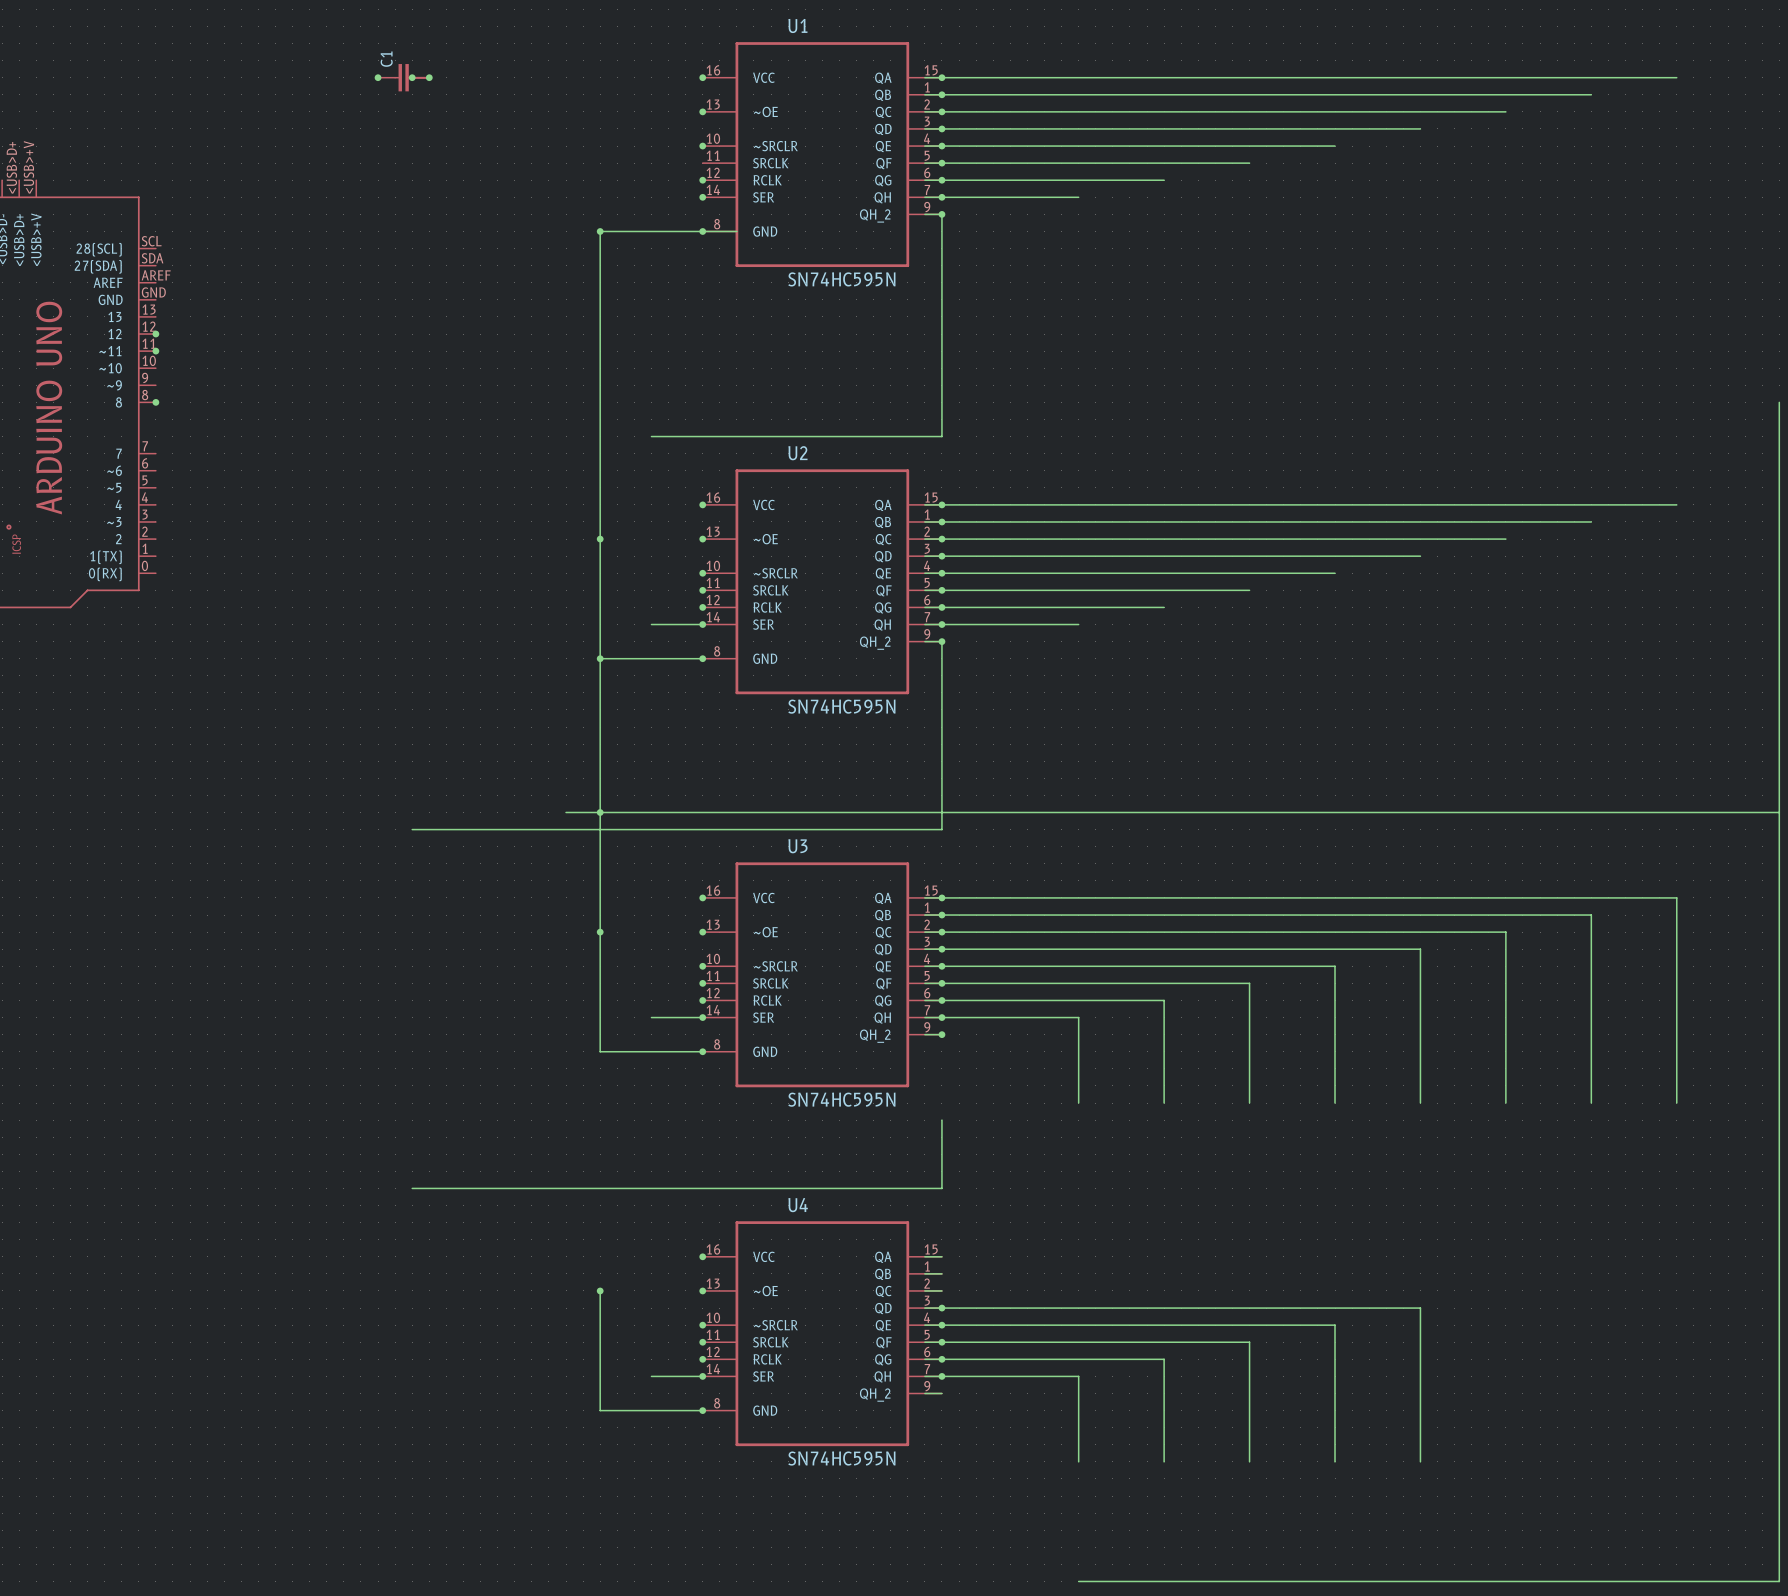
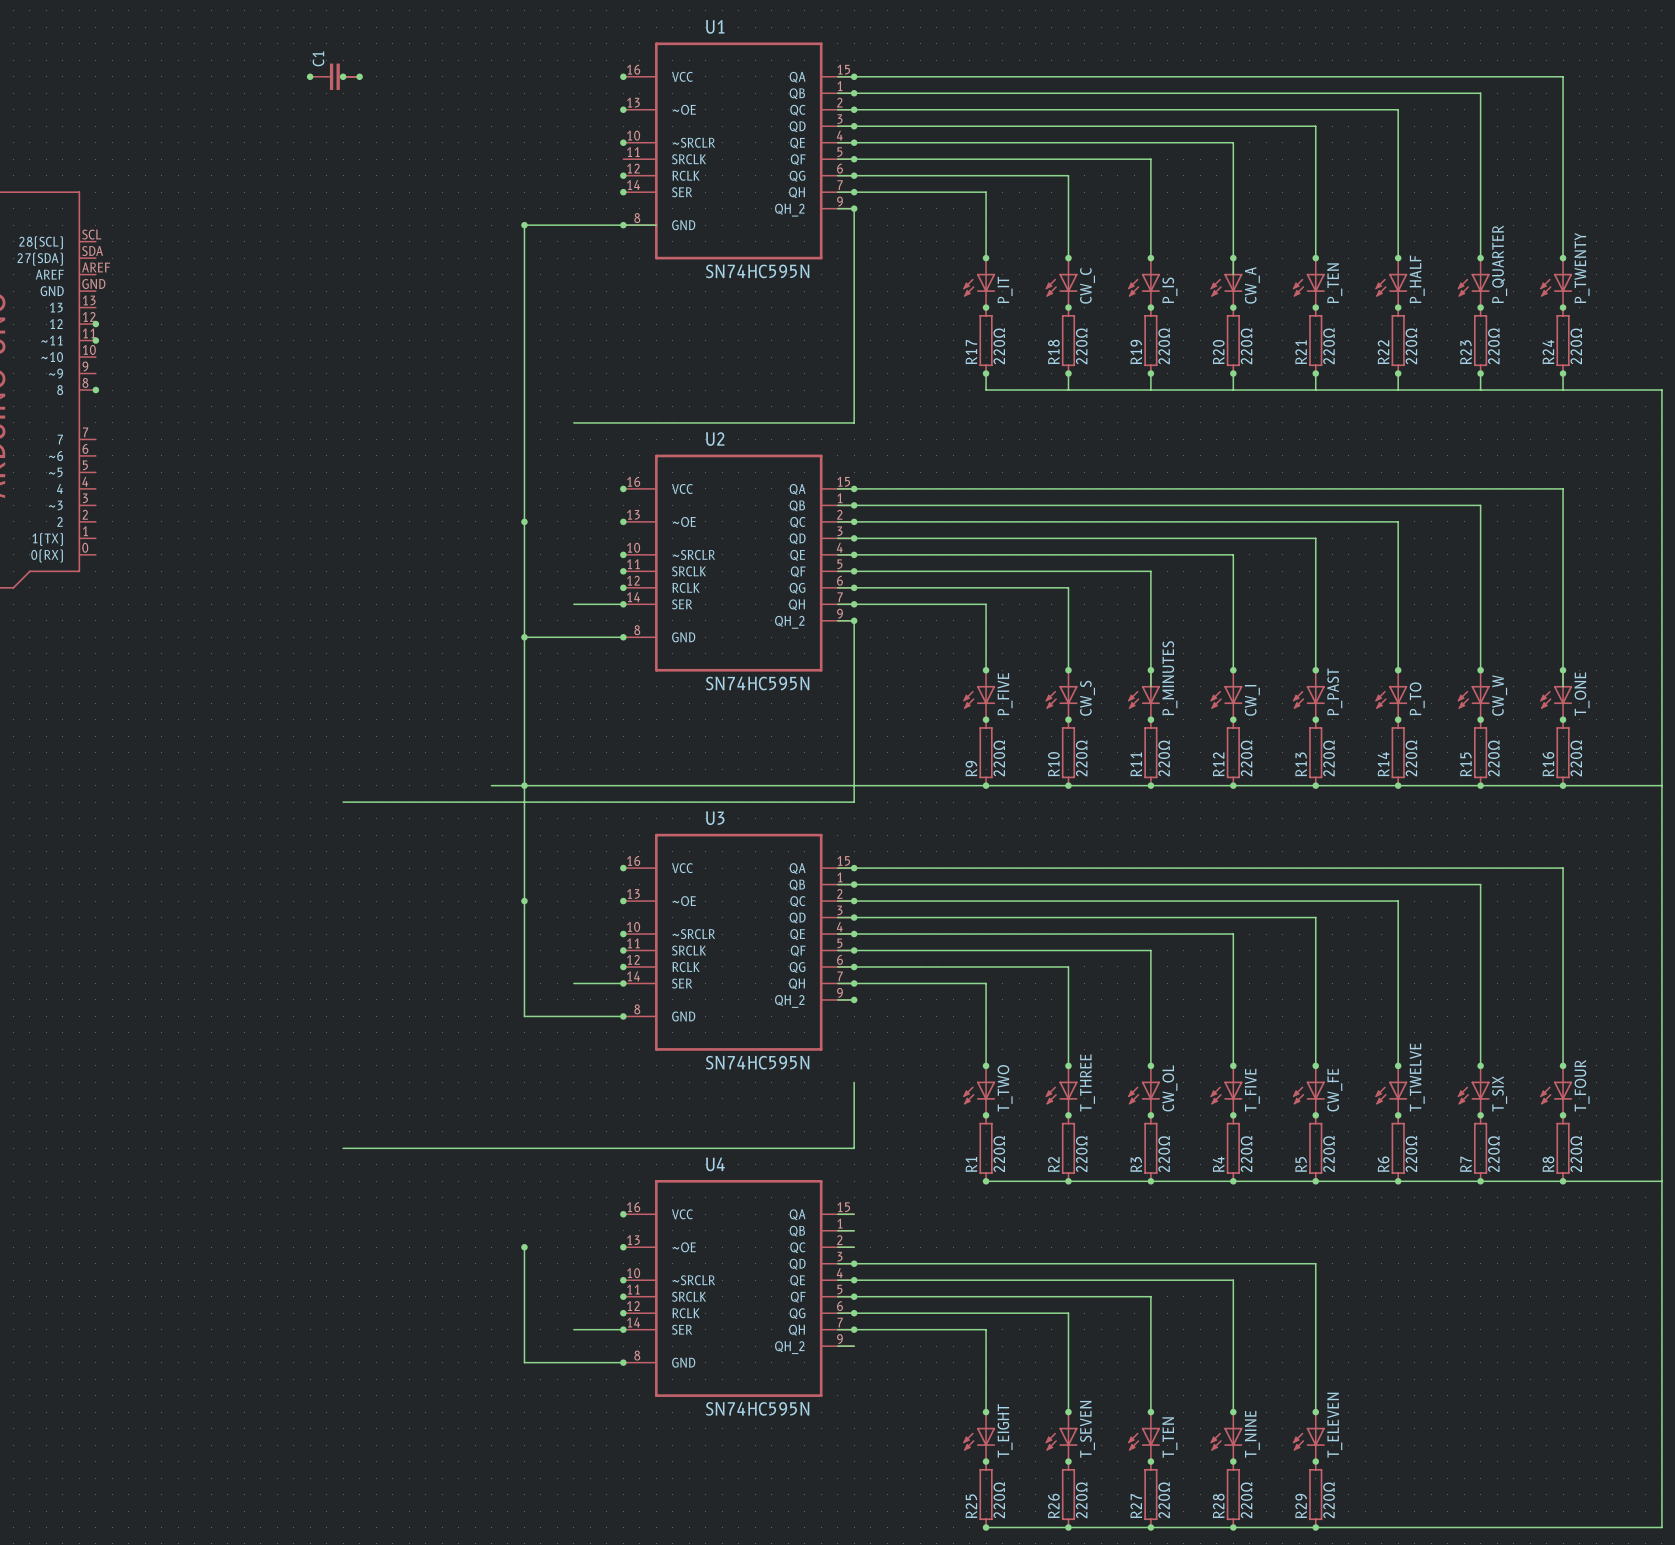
wire: none -> (1563, 76) (1563, 258)
wire: none -> (1480, 93) (1480, 258)
wire: none -> (1398, 109) (1398, 258)
wire: none -> (1315, 126) (1315, 258)
wire: none -> (1233, 142) (1233, 274)
wire: none -> (1150, 159) (1150, 258)
wire: none -> (1068, 175) (1068, 258)
wire: none -> (986, 192) (986, 258)
junction: none -> (986, 258)
junction: none -> (1068, 258)
junction: none -> (1150, 258)
junction: none -> (1233, 258)
junction: none -> (1315, 258)
junction: none -> (1398, 258)
junction: none -> (1480, 258)
junction: none -> (1563, 258)
P_IT: none -> (979, 282)
CW_C: none -> (1061, 282)
P_IS: none -> (1144, 282)
CW_A: none -> (1226, 282)
P_TEN: none -> (1308, 282)
P_HALF: none -> (1391, 282)
P_QUARTER: none -> (1473, 282)
P_TWENTY: none -> (1556, 282)
junction: none -> (986, 307)
junction: none -> (1068, 307)
junction: none -> (1150, 307)
junction: none -> (1233, 307)
junction: none -> (1315, 307)
junction: none -> (1398, 307)
junction: none -> (1480, 307)
junction: none -> (1563, 307)
R17: none -> 220Ω (986, 340)
R18: none -> 220Ω (1068, 340)
R19: none -> 220Ω (1150, 340)
R20: none -> 220Ω (1233, 340)
R21: none -> 220Ω (1315, 340)
R22: none -> 220Ω (1398, 340)
R23: none -> 220Ω (1480, 340)
R24: none -> 220Ω (1563, 340)
wire: none -> (986, 373) (986, 390) (1661, 390)
junction: none -> (986, 373)
wire: none -> (1068, 373) (1068, 390)
junction: none -> (1068, 373)
wire: none -> (1150, 373) (1150, 390)
junction: none -> (1150, 373)
wire: none -> (1233, 373) (1233, 390)
junction: none -> (1233, 373)
wire: none -> (1315, 373) (1315, 390)
junction: none -> (1315, 373)
wire: none -> (1398, 373) (1398, 390)
junction: none -> (1398, 373)
wire: none -> (1480, 373) (1480, 390)
junction: none -> (1480, 373)
wire: none -> (1563, 373) (1563, 390)
junction: none -> (1563, 373)
wire: none -> (1563, 488) (1563, 686)
wire: none -> (1480, 505) (1480, 670)
wire: none -> (1398, 521) (1398, 670)
wire: none -> (1315, 538) (1315, 670)
wire: none -> (1233, 554) (1233, 670)
wire: none -> (1150, 571) (1150, 686)
wire: none -> (1068, 587) (1068, 670)
wire: none -> (986, 604) (986, 670)
junction: none -> (986, 670)
junction: none -> (1068, 670)
junction: none -> (1150, 670)
junction: none -> (1233, 670)
junction: none -> (1315, 670)
junction: none -> (1398, 670)
junction: none -> (1480, 670)
junction: none -> (1563, 670)
P_FIVE: none -> (979, 694)
CW_S: none -> (1061, 694)
P_MINUTES: none -> (1144, 694)
CW_I: none -> (1226, 694)
P_PAST: none -> (1308, 694)
P_TO: none -> (1391, 694)
CW_W: none -> (1473, 694)
T_ONE: none -> (1556, 694)
junction: none -> (986, 719)
junction: none -> (1068, 719)
junction: none -> (1150, 719)
junction: none -> (1233, 719)
junction: none -> (1315, 719)
junction: none -> (1398, 719)
junction: none -> (1480, 719)
junction: none -> (1563, 719)
R9: none -> 220Ω (986, 752)
R10: none -> 220Ω (1068, 752)
R11: none -> 220Ω (1150, 752)
R12: none -> 220Ω (1233, 752)
R13: none -> 220Ω (1315, 752)
R14: none -> 220Ω (1398, 752)
R15: none -> 220Ω (1480, 752)
R16: none -> 220Ω (1563, 752)
junction: none -> (986, 785)
junction: none -> (1068, 785)
junction: none -> (1150, 785)
junction: none -> (1233, 785)
junction: none -> (1315, 785)
junction: none -> (1398, 785)
junction: none -> (1480, 785)
junction: none -> (1563, 785)
junction: none -> (986, 1065)
junction: none -> (1068, 1065)
junction: none -> (1150, 1065)
junction: none -> (1233, 1065)
junction: none -> (1315, 1065)
junction: none -> (1398, 1065)
junction: none -> (1480, 1065)
junction: none -> (1563, 1065)
T_TWO: none -> (979, 1090)
T_THREE: none -> (1061, 1090)
CW_OL: none -> (1144, 1090)
T_FIVE: none -> (1226, 1090)
CW_FE: none -> (1308, 1090)
T_TWELVE: none -> (1391, 1090)
T_SIX: none -> (1473, 1090)
T_FOUR: none -> (1556, 1090)
junction: none -> (986, 1115)
junction: none -> (1068, 1115)
junction: none -> (1150, 1115)
junction: none -> (1233, 1115)
junction: none -> (1315, 1115)
junction: none -> (1398, 1115)
junction: none -> (1480, 1115)
junction: none -> (1563, 1115)
R1: none -> 220Ω (986, 1148)
R2: none -> 220Ω (1068, 1148)
R3: none -> 220Ω (1150, 1148)
R4: none -> 220Ω (1233, 1148)
R5: none -> 220Ω (1315, 1148)
R6: none -> 220Ω (1398, 1148)
R7: none -> 220Ω (1480, 1148)
R8: none -> 220Ω (1563, 1148)
wire: none -> (986, 1181) (1661, 1181)
junction: none -> (986, 1181)
junction: none -> (1068, 1181)
junction: none -> (1150, 1181)
junction: none -> (1233, 1181)
junction: none -> (1315, 1181)
junction: none -> (1398, 1181)
junction: none -> (1480, 1181)
junction: none -> (1563, 1181)
junction: none -> (986, 1412)
junction: none -> (1068, 1412)
junction: none -> (1150, 1412)
junction: none -> (1233, 1412)
junction: none -> (1315, 1412)
T_EIGHT: none -> (979, 1436)
T_SEVEN: none -> (1061, 1436)
T_TEN: none -> (1144, 1436)
T_NINE: none -> (1226, 1436)
T_ELEVEN: none -> (1308, 1436)
junction: none -> (986, 1461)
junction: none -> (1068, 1461)
junction: none -> (1150, 1461)
junction: none -> (1233, 1461)
junction: none -> (1315, 1461)
R25: none -> 220Ω (986, 1494)
R26: none -> 220Ω (1068, 1494)
R27: none -> 220Ω (1150, 1494)
R28: none -> 220Ω (1233, 1494)
R29: none -> 220Ω (1315, 1494)
junction: none -> (986, 1527)
junction: none -> (1068, 1527)
junction: none -> (1150, 1527)
junction: none -> (1233, 1527)
junction: none -> (1315, 1527)

